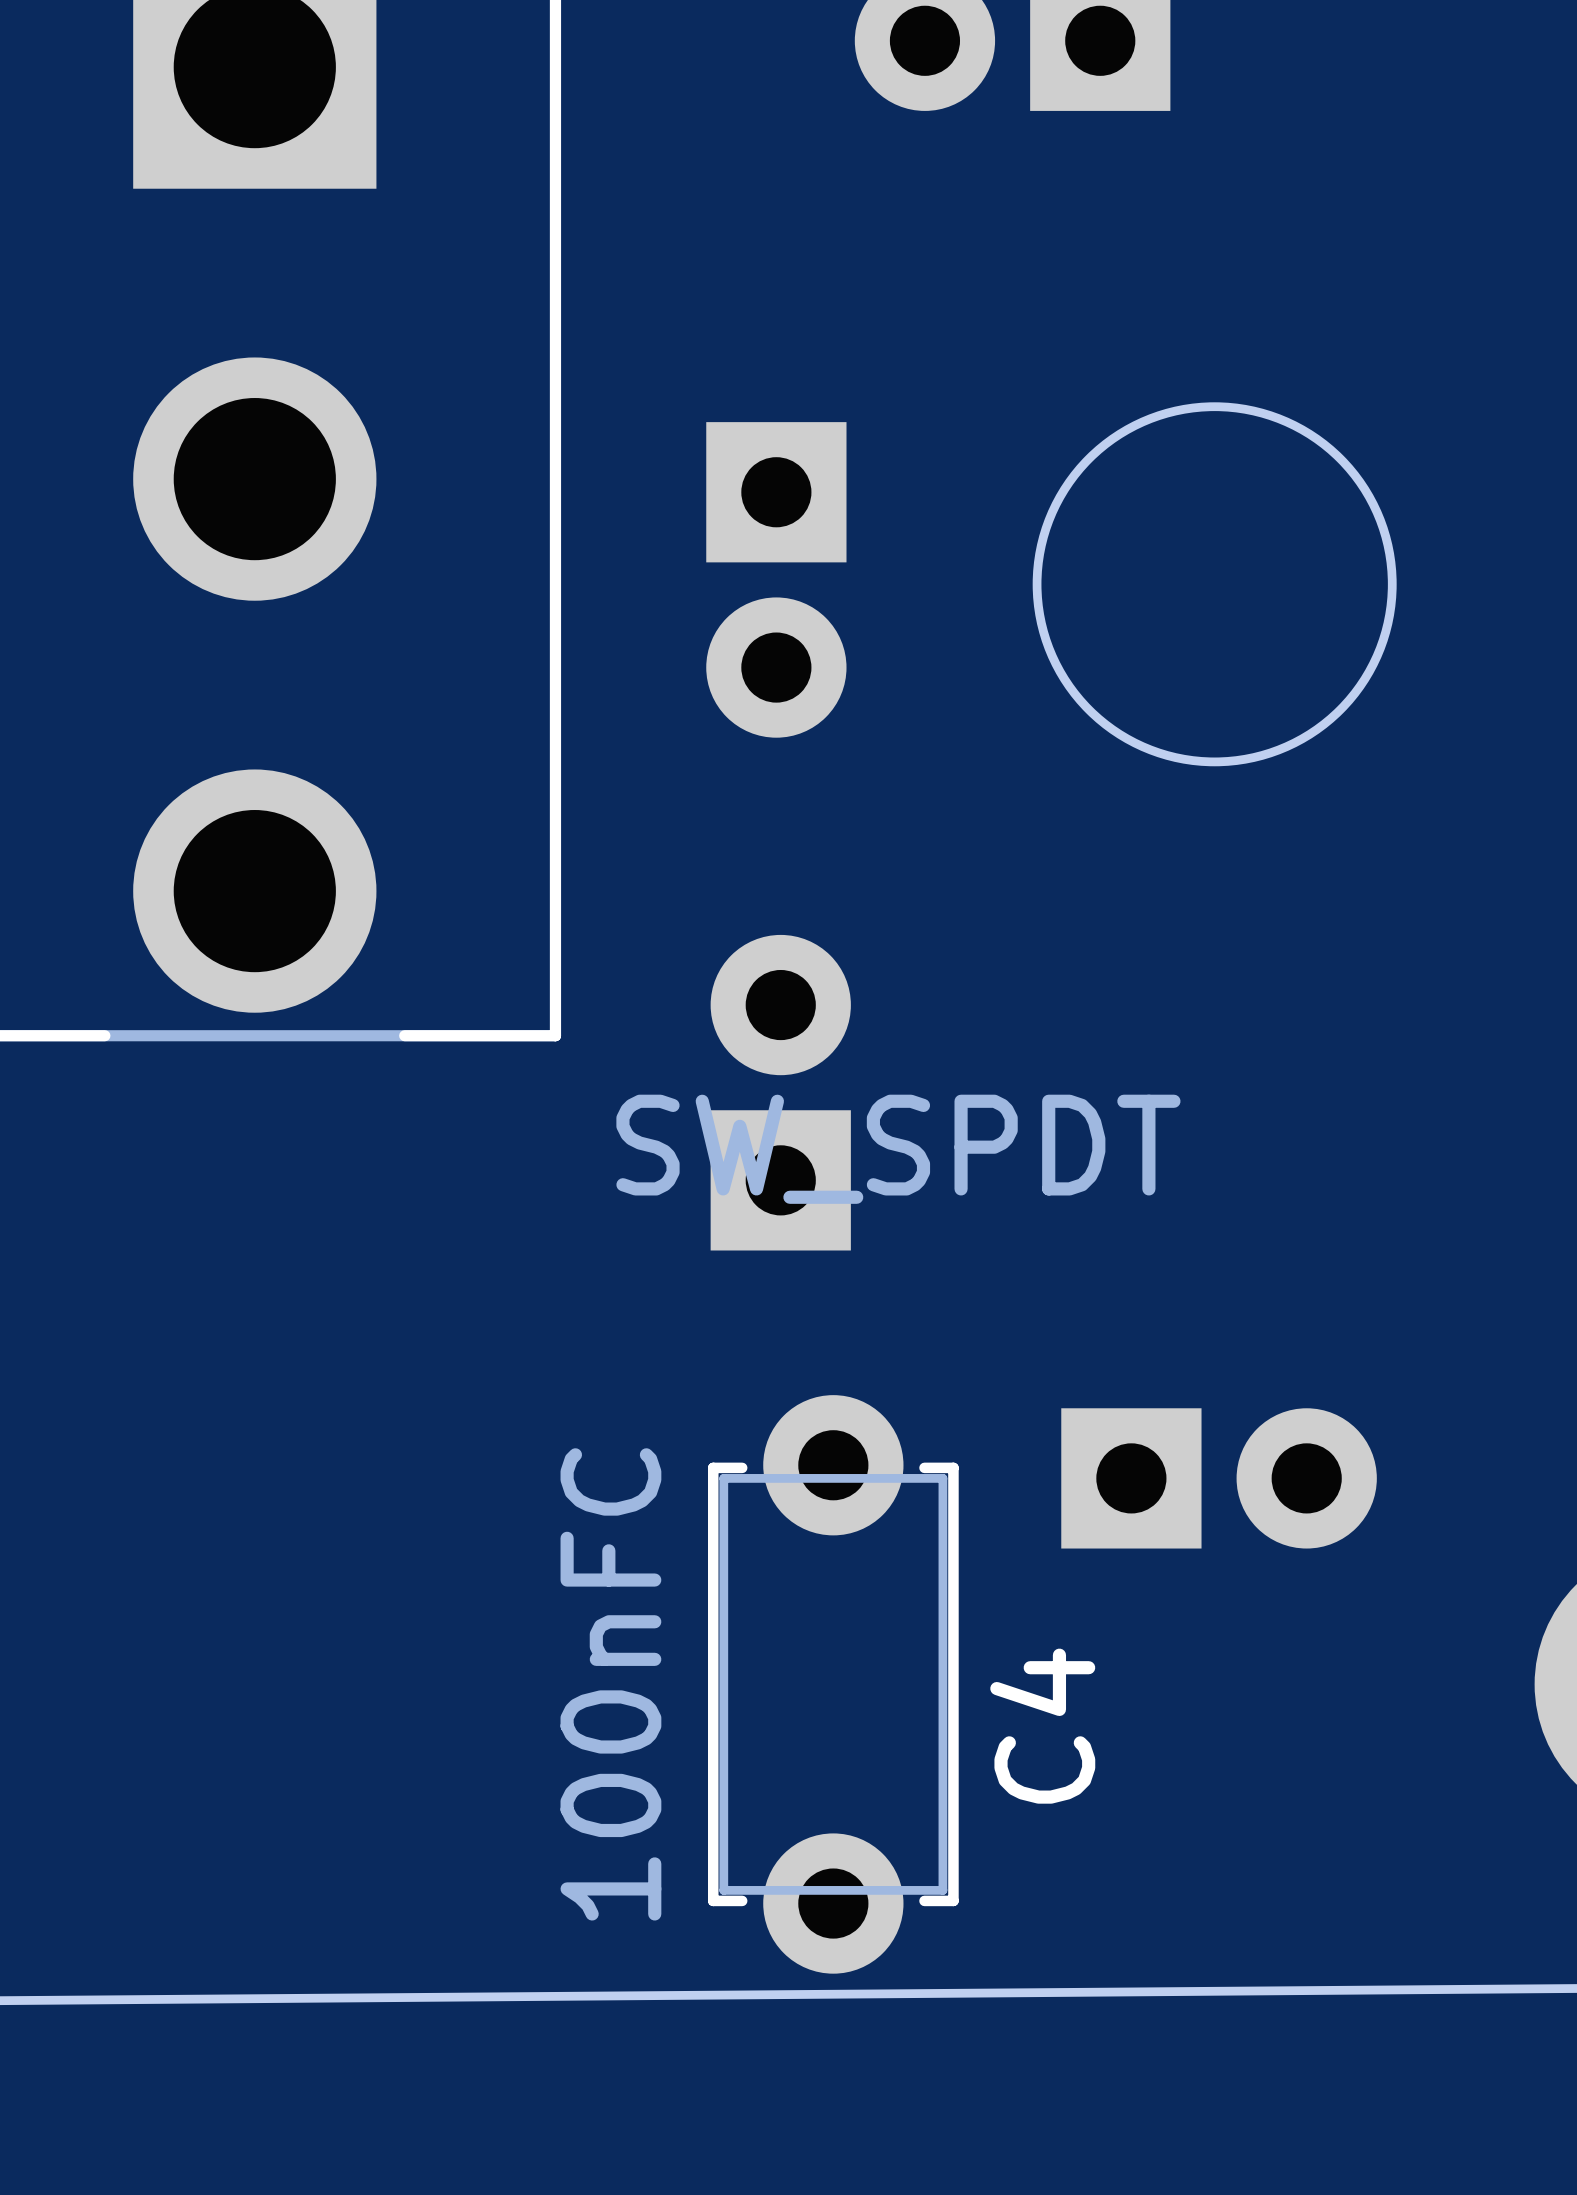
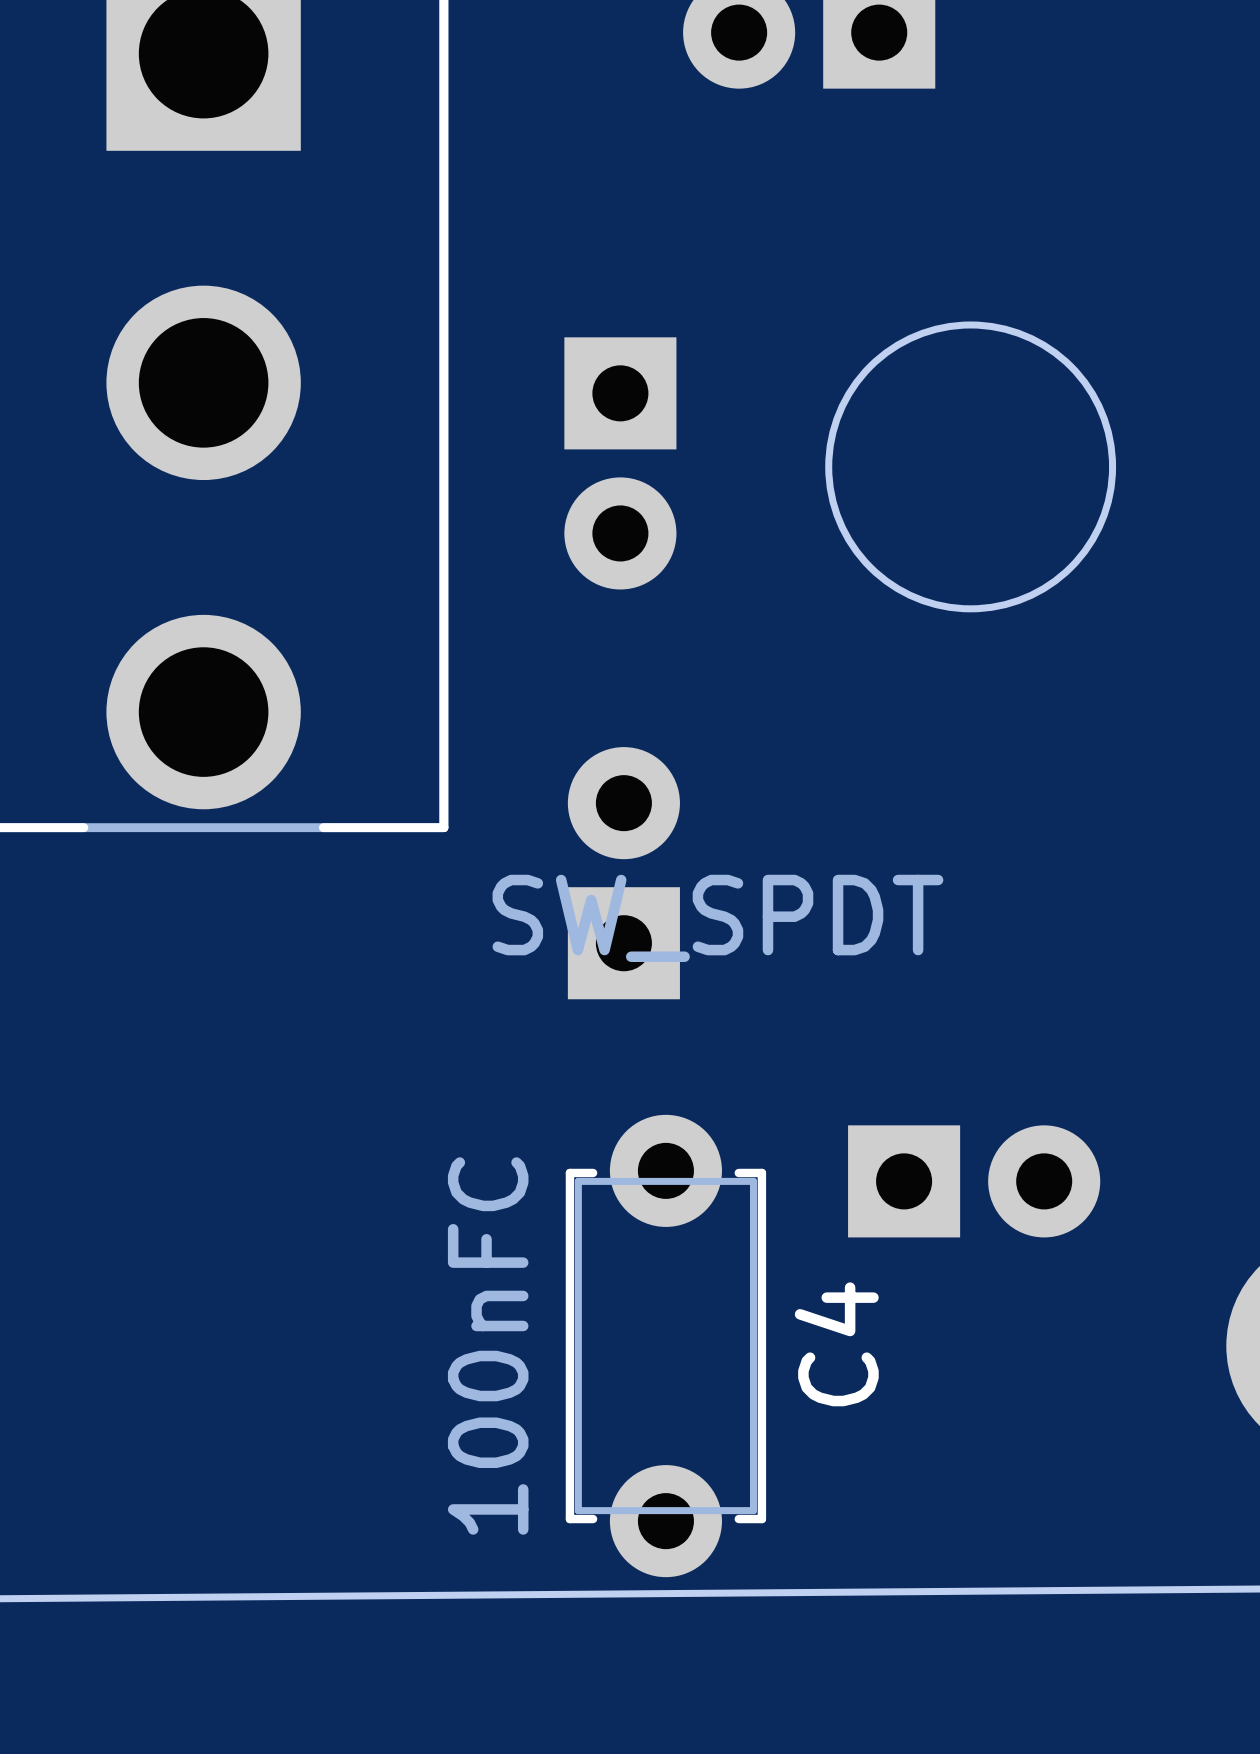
C4 name position: C4 (1042, 1726) -> C4 (836, 1344)

